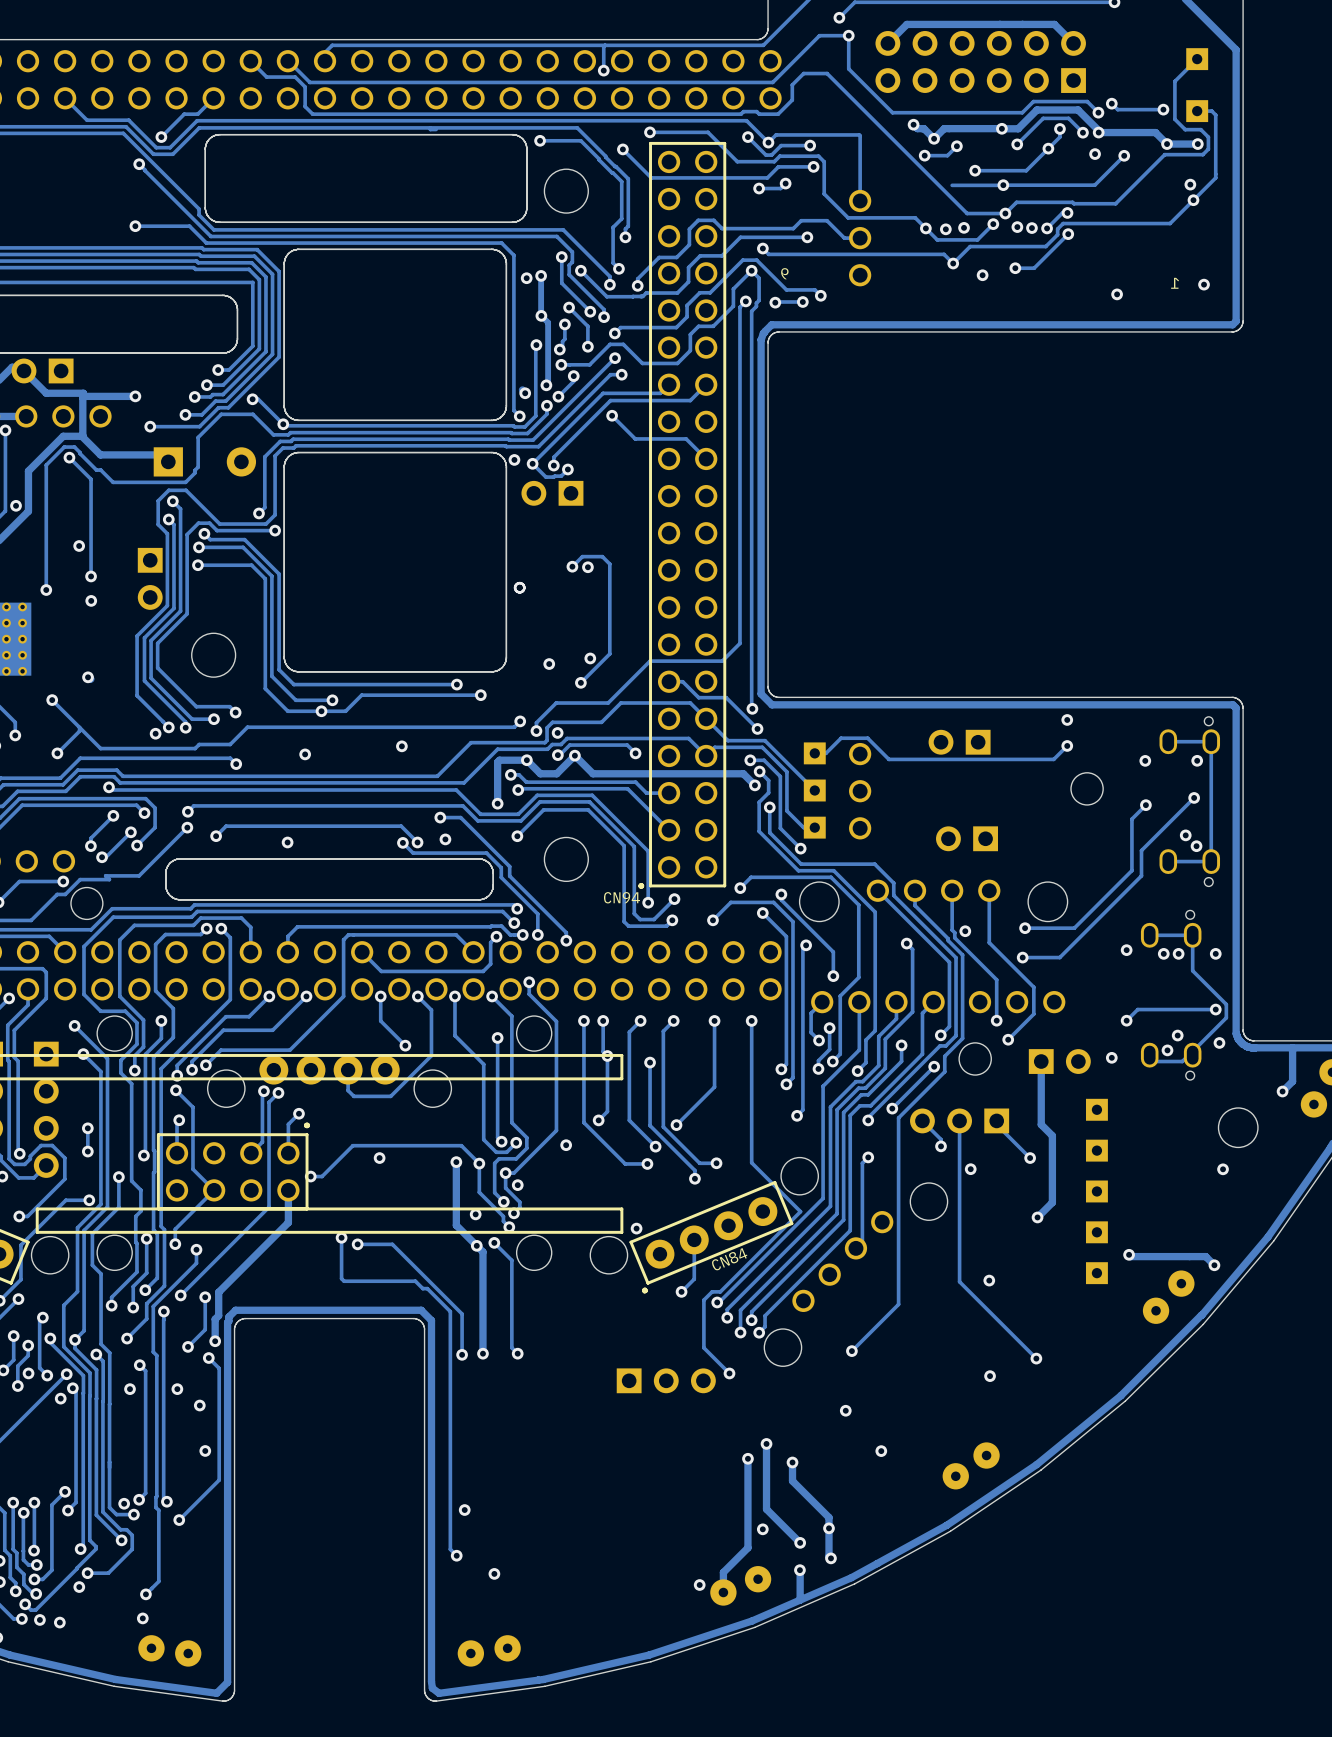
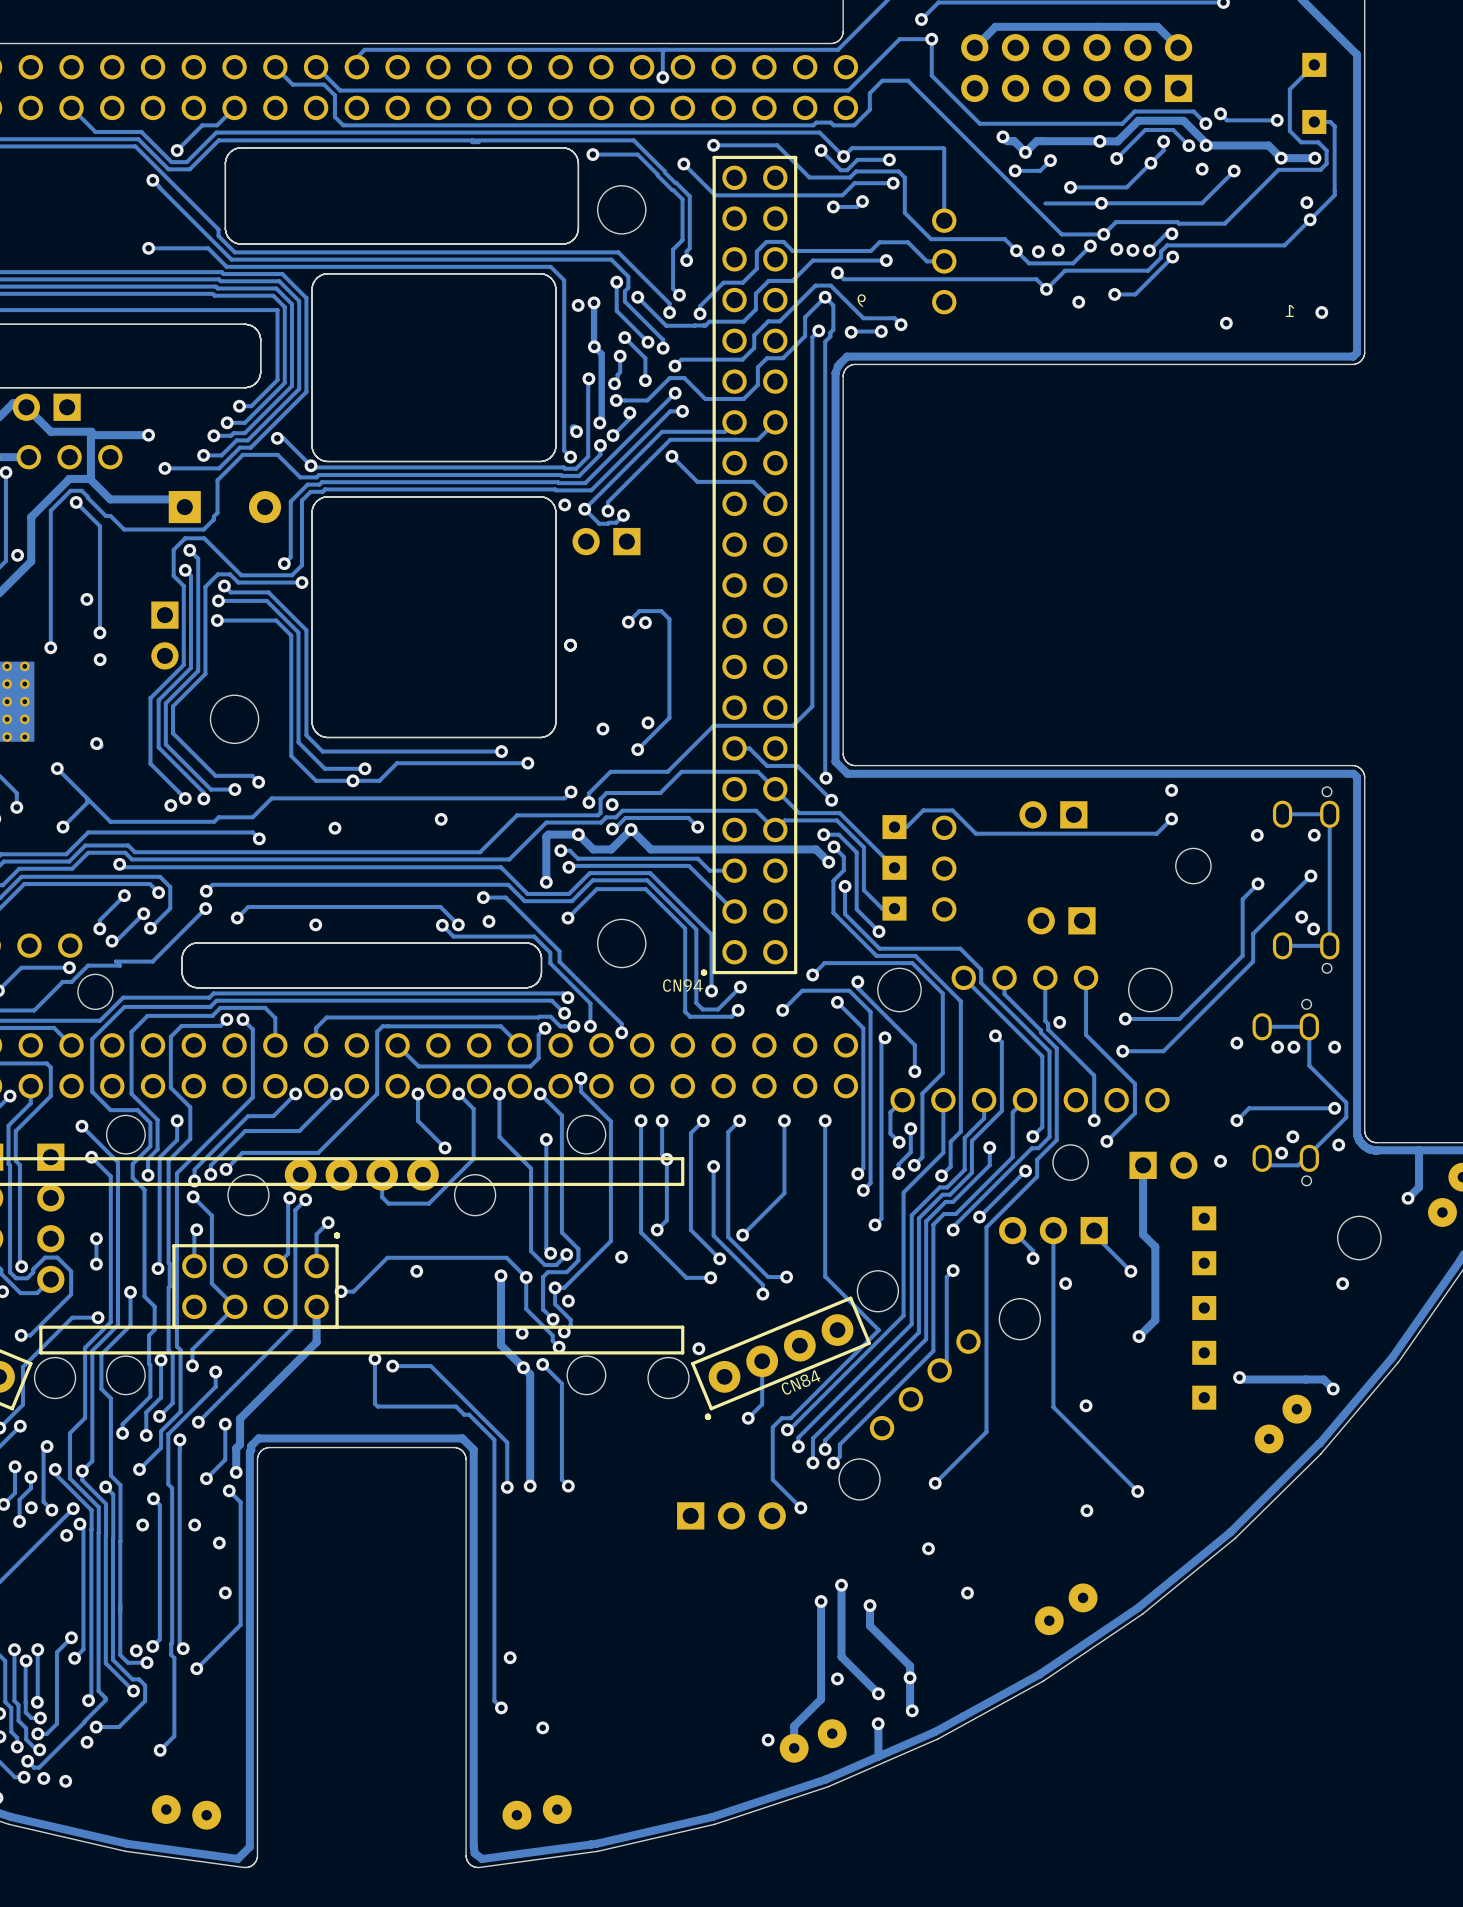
via: (142, 1618) -> none

